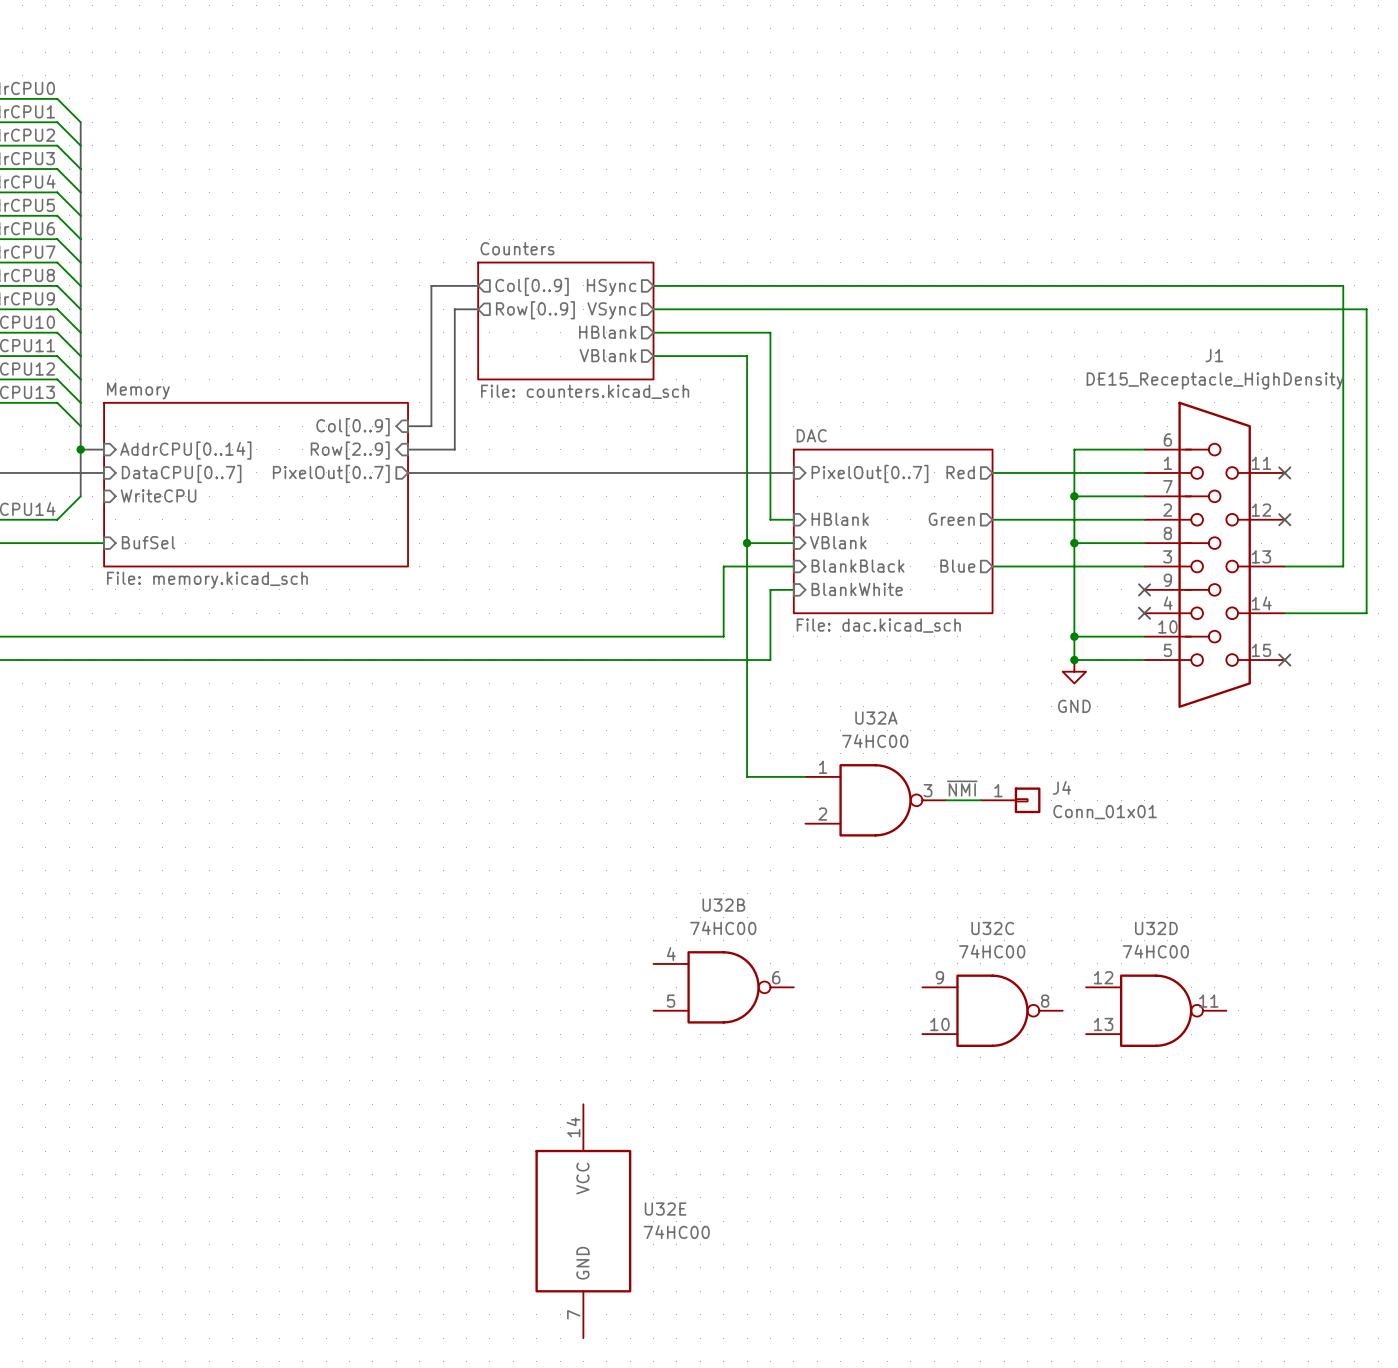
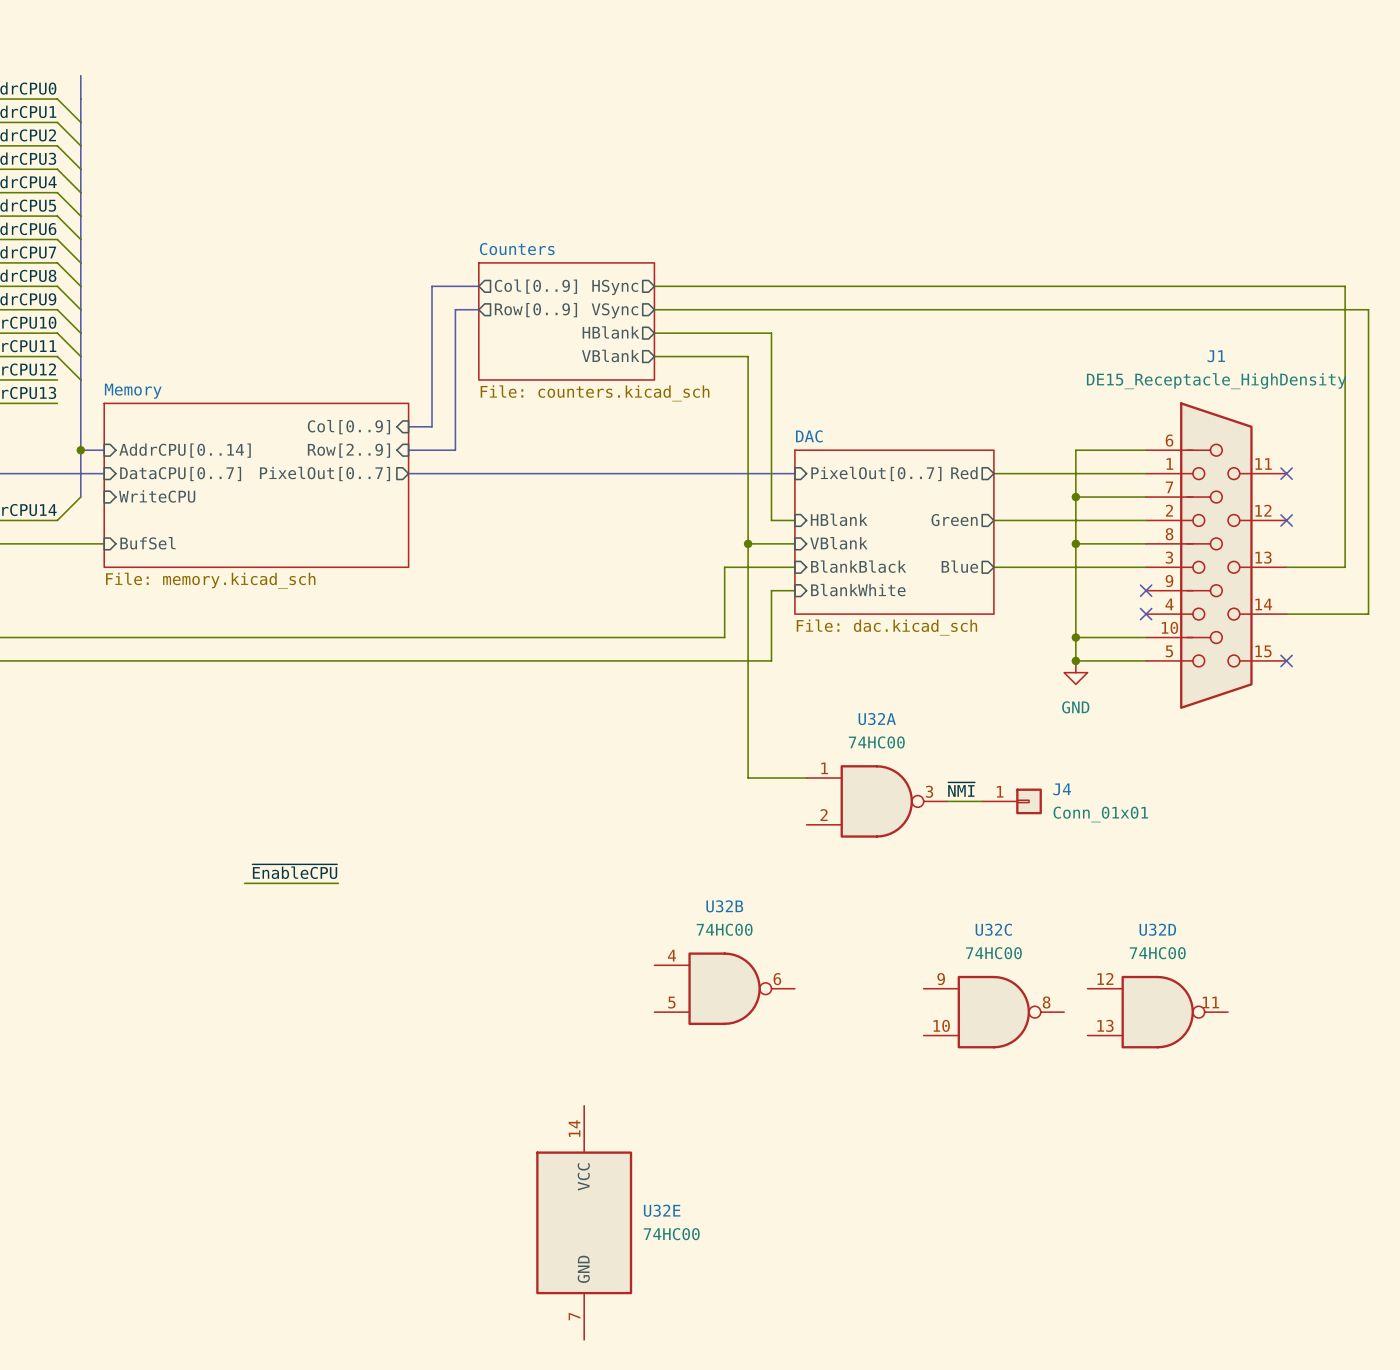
bus: none -> (80, 75) (80, 122)
wire: (57, 379) (80, 402) -> none
wire: (57, 402) (80, 426) -> none
label: none -> ~{EnableCPU} (294, 871)
wire: none -> (244, 883) (338, 883)

